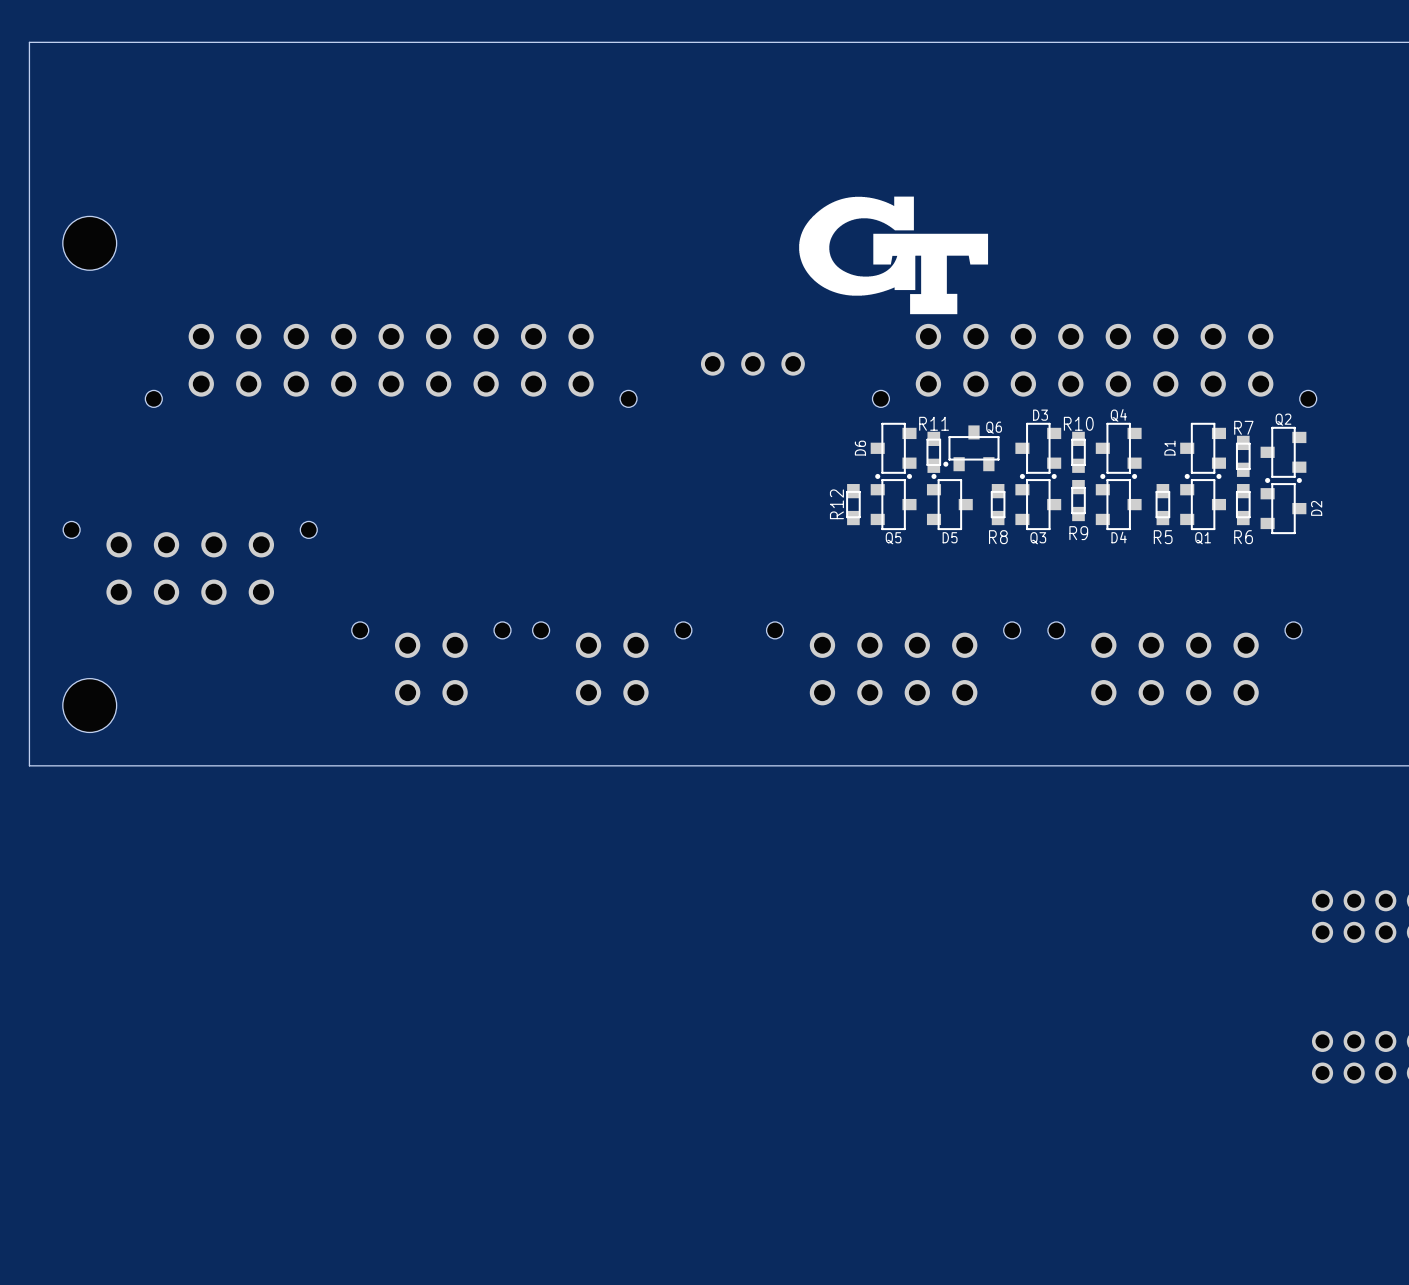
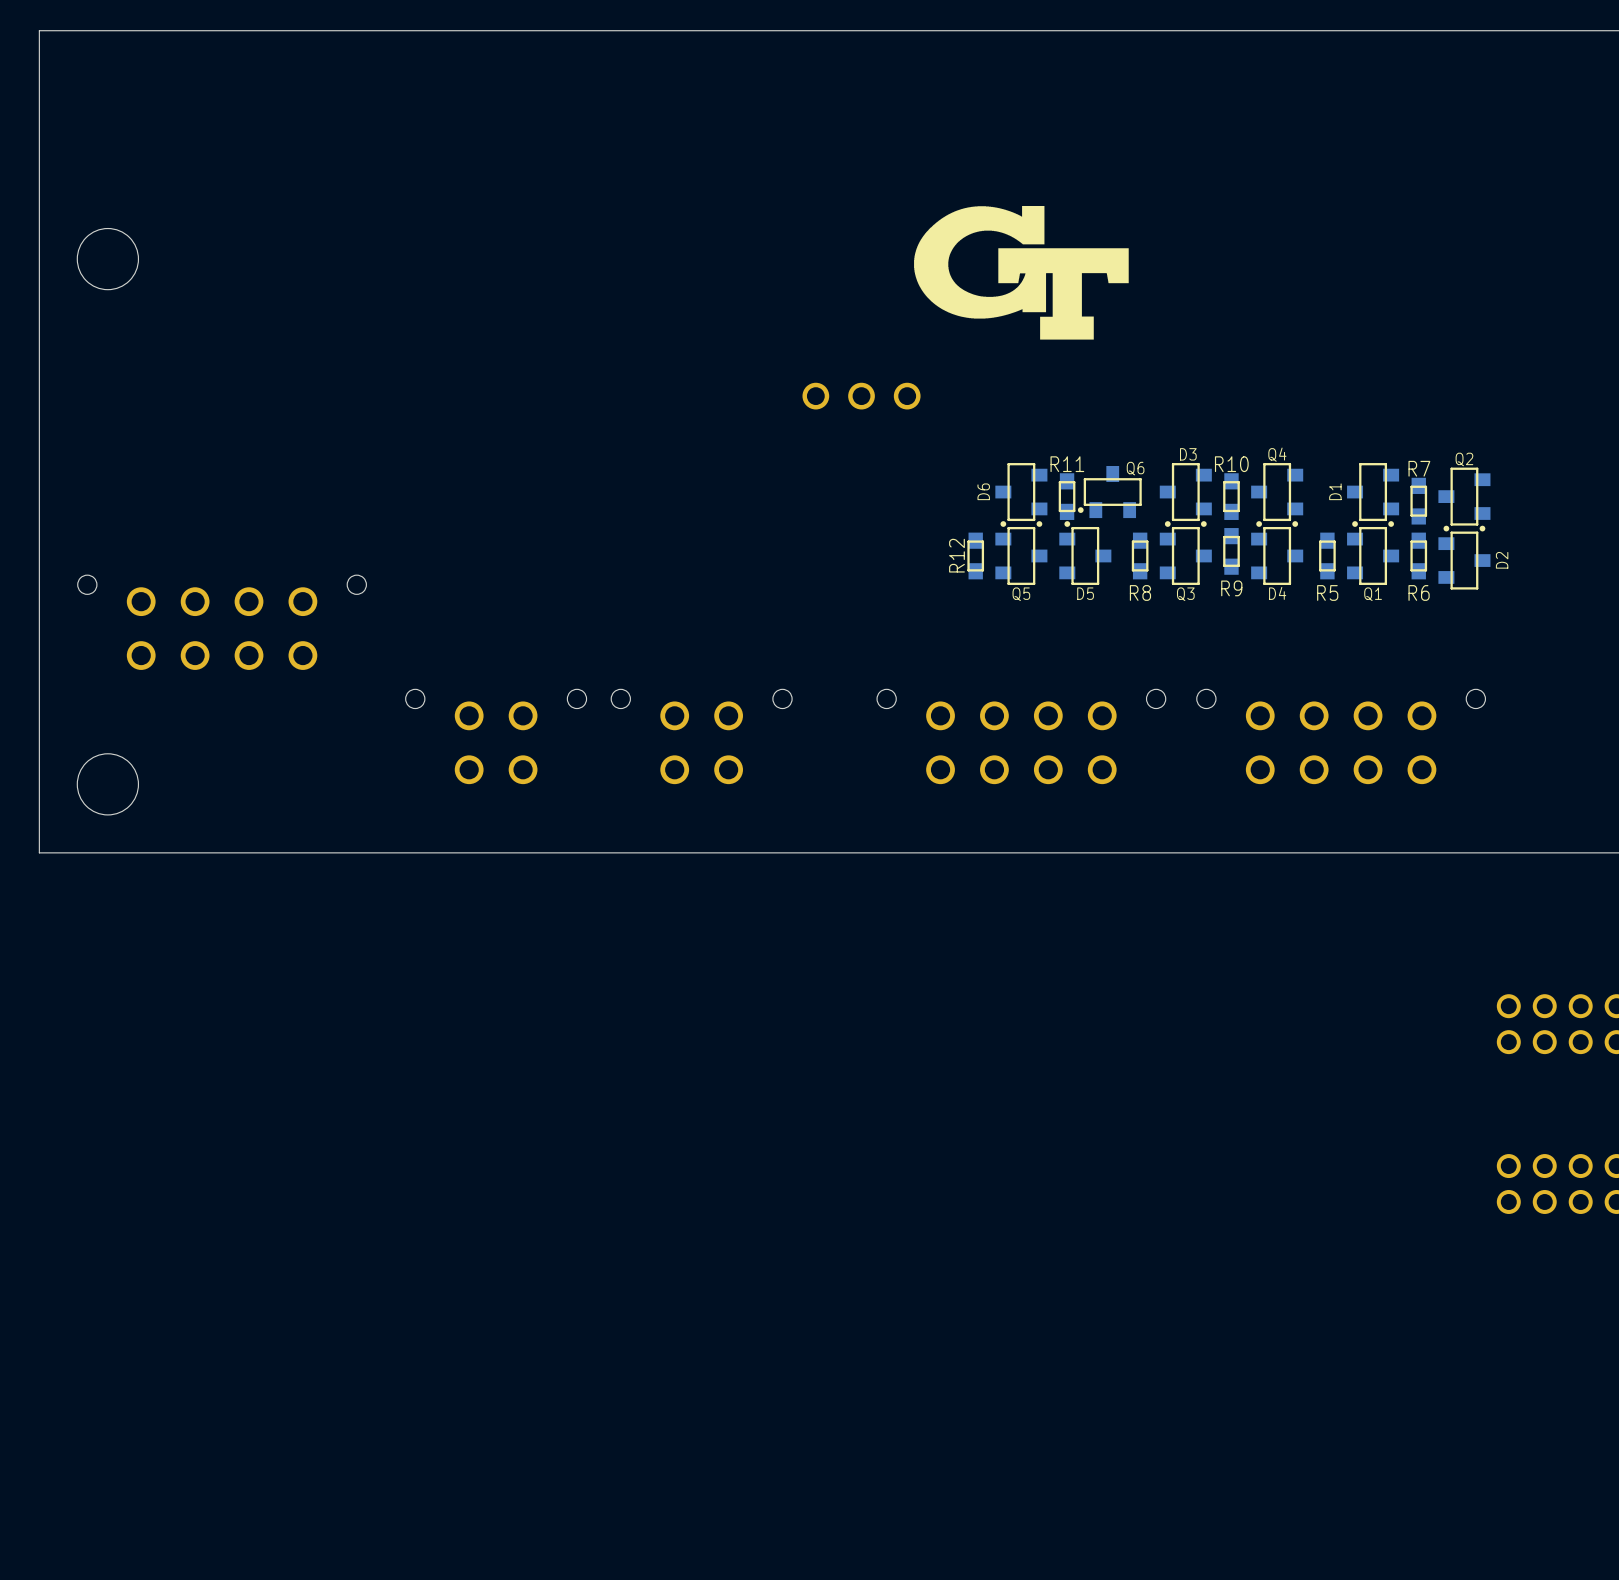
part: (391, 365) -> none
part: (1094, 365) -> none

